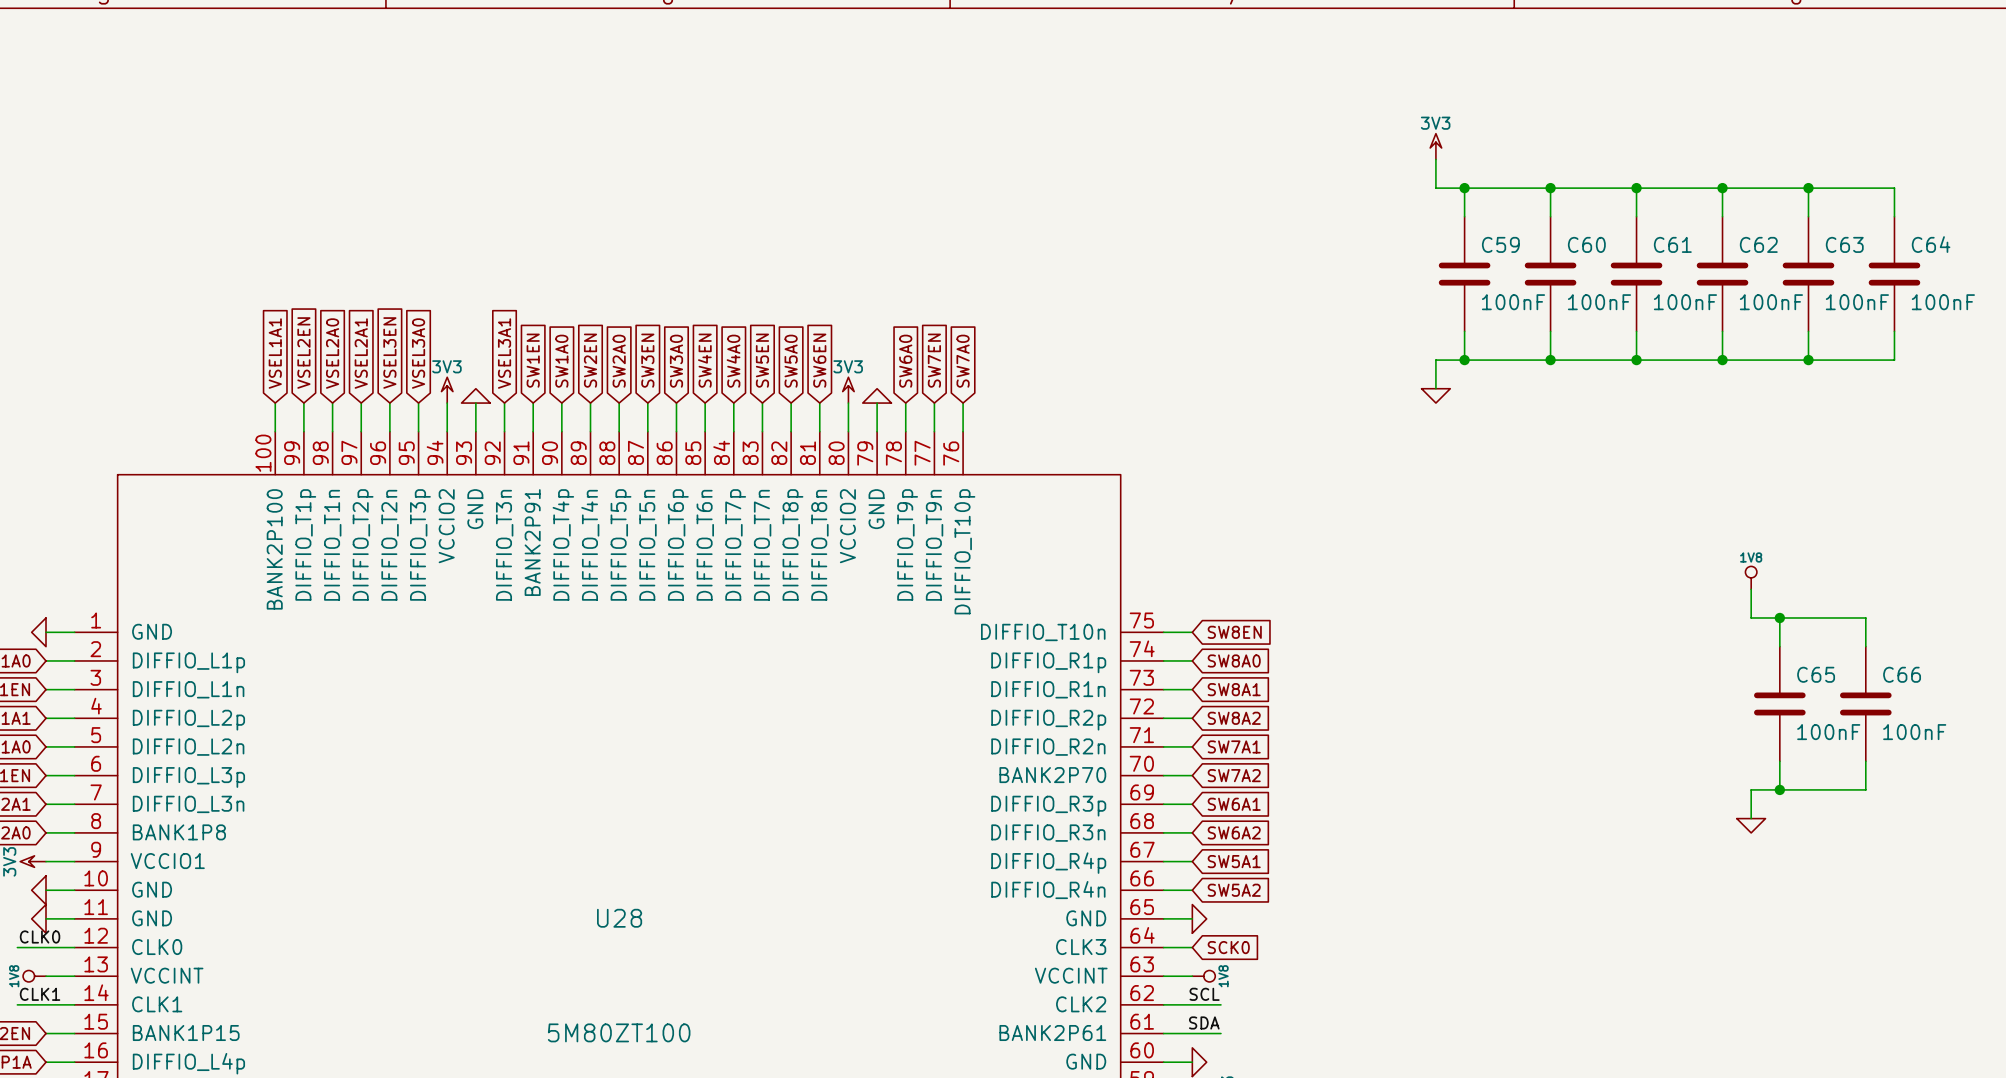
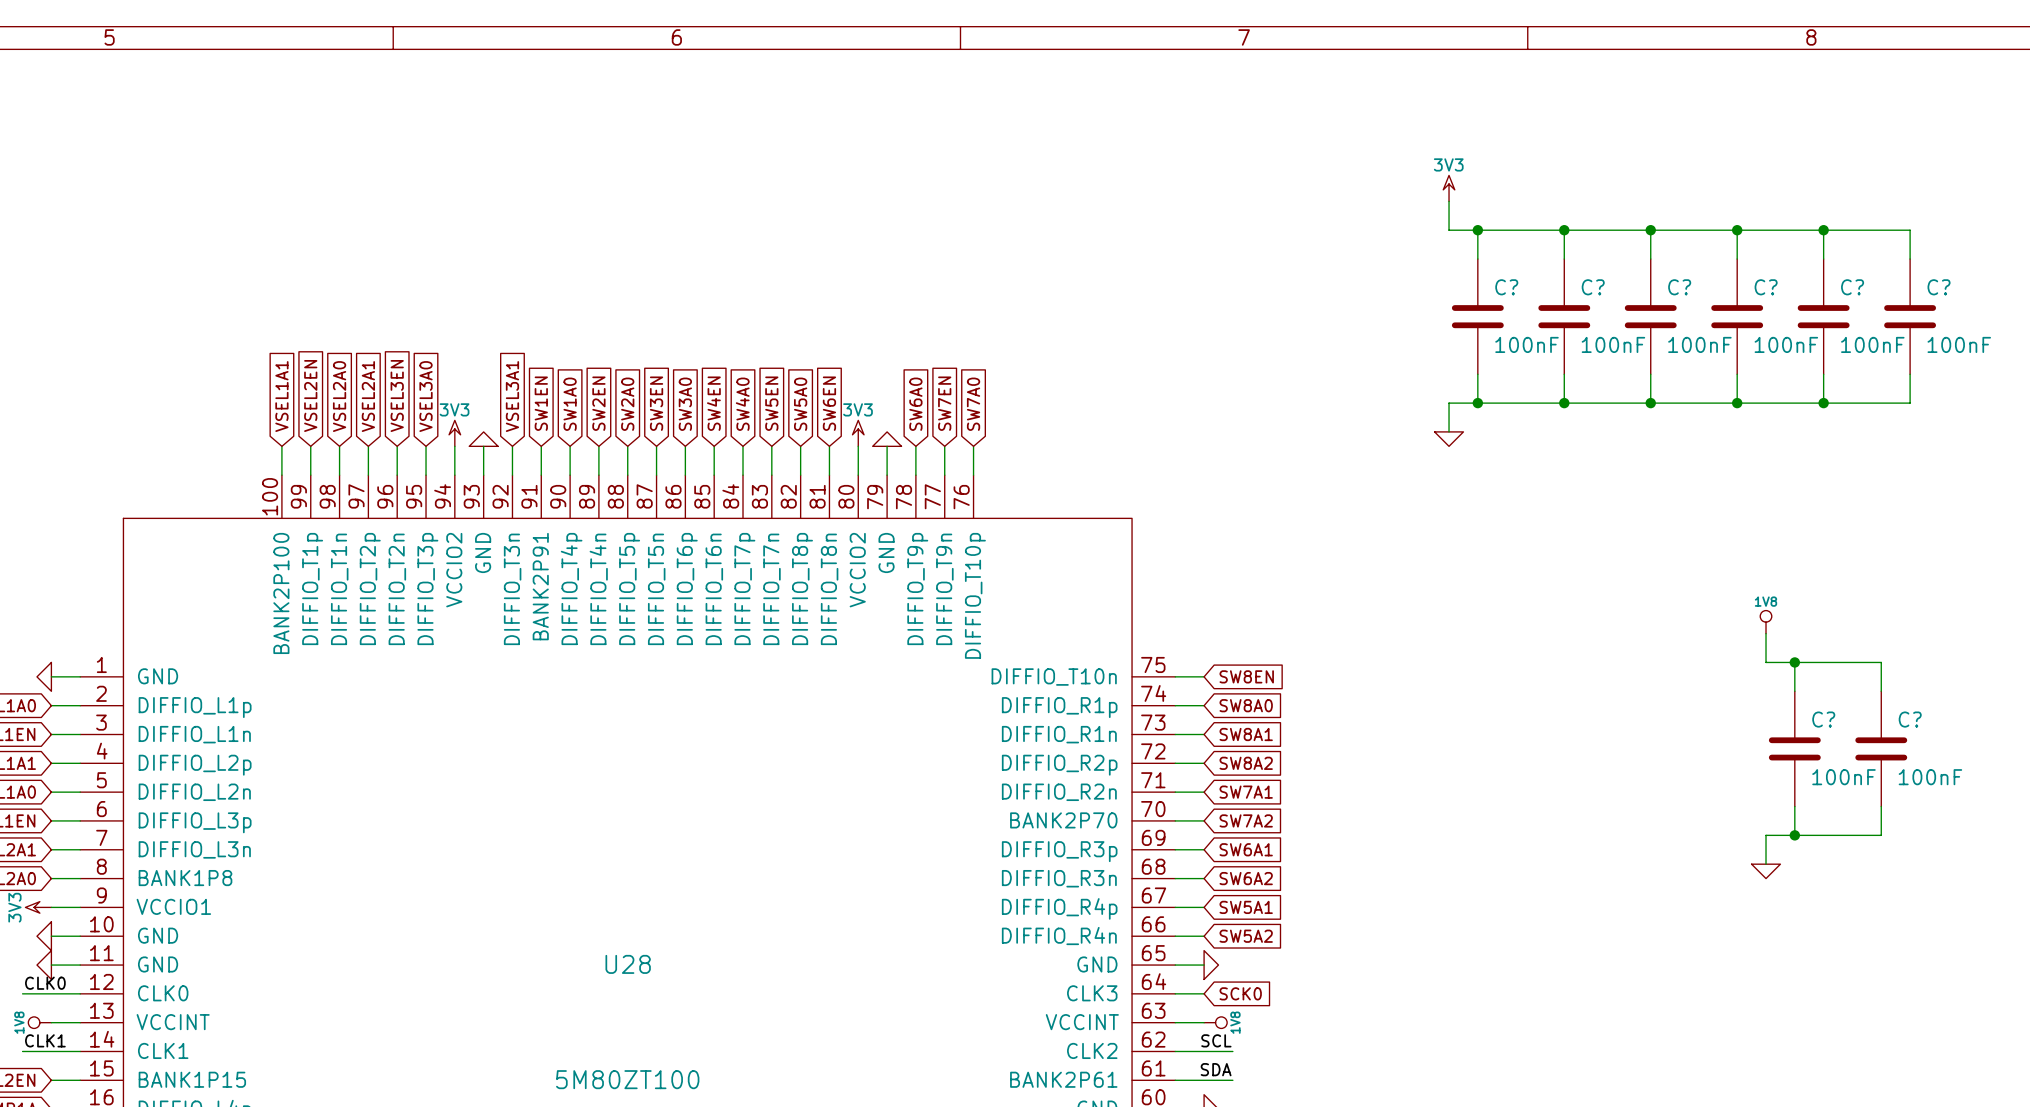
C59 name: C59 (1500, 244) -> C? (1506, 287)
C60 name: C60 (1586, 244) -> C? (1593, 287)
C61 name: C61 (1672, 244) -> C? (1679, 287)
C62 name: C62 (1758, 244) -> C? (1766, 287)
C63 name: C63 (1844, 244) -> C? (1852, 287)
C64 name: C64 (1931, 244) -> C? (1939, 287)
C65 name: C65 (1816, 674) -> C? (1823, 719)
C66 name: C66 (1902, 674) -> C? (1910, 719)

